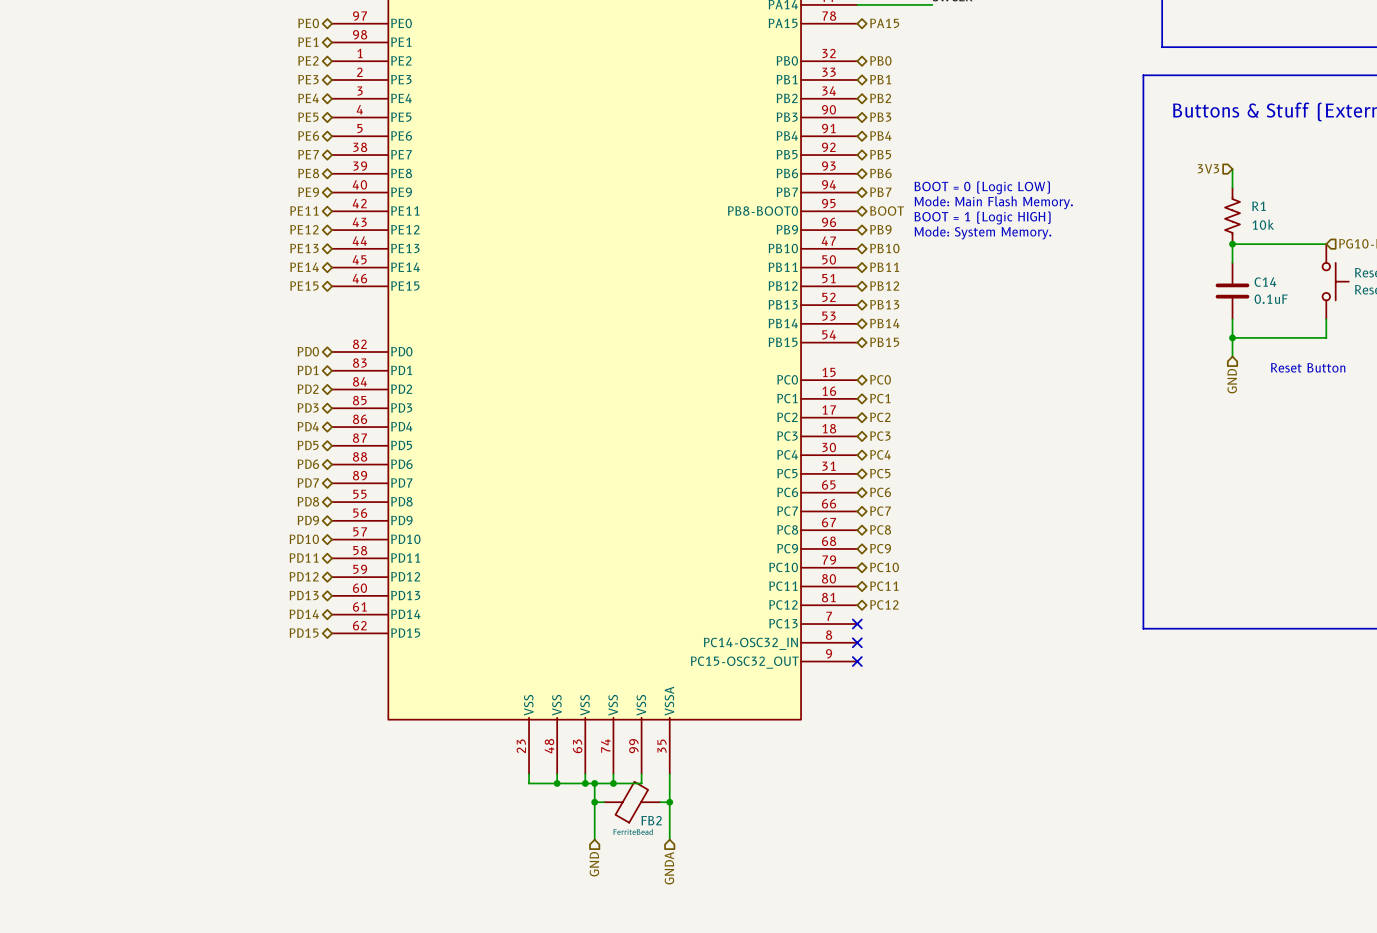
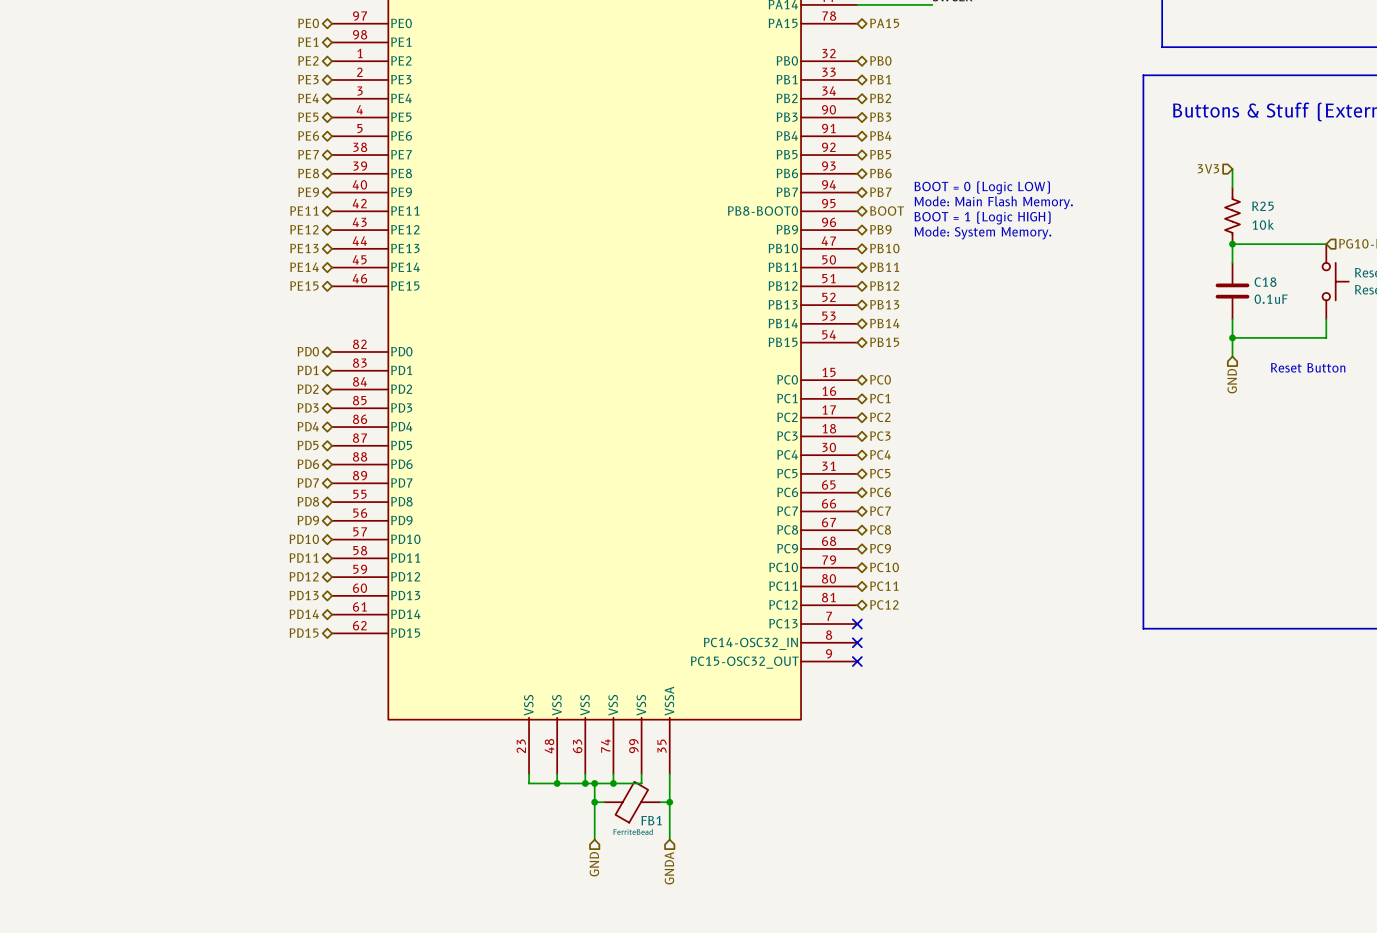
R1 name: R1 (1258, 206) -> R25 (1263, 206)
C14 name: C14 (1265, 282) -> C18 (1265, 282)
FB2 name: FB2 (651, 820) -> FB1 (651, 820)

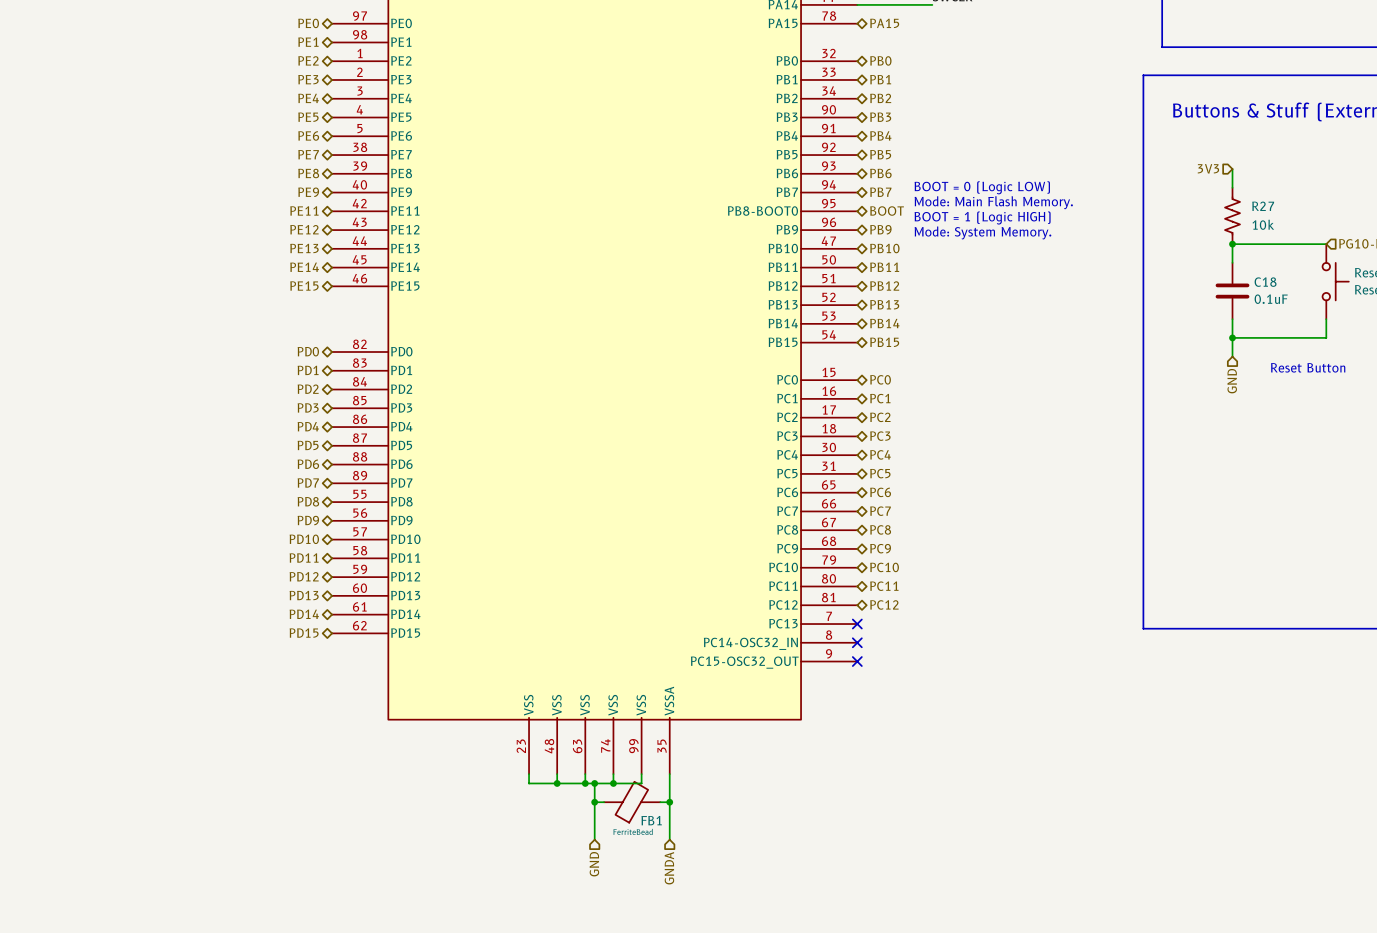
R25 name: R25 (1263, 206) -> R27 (1263, 206)

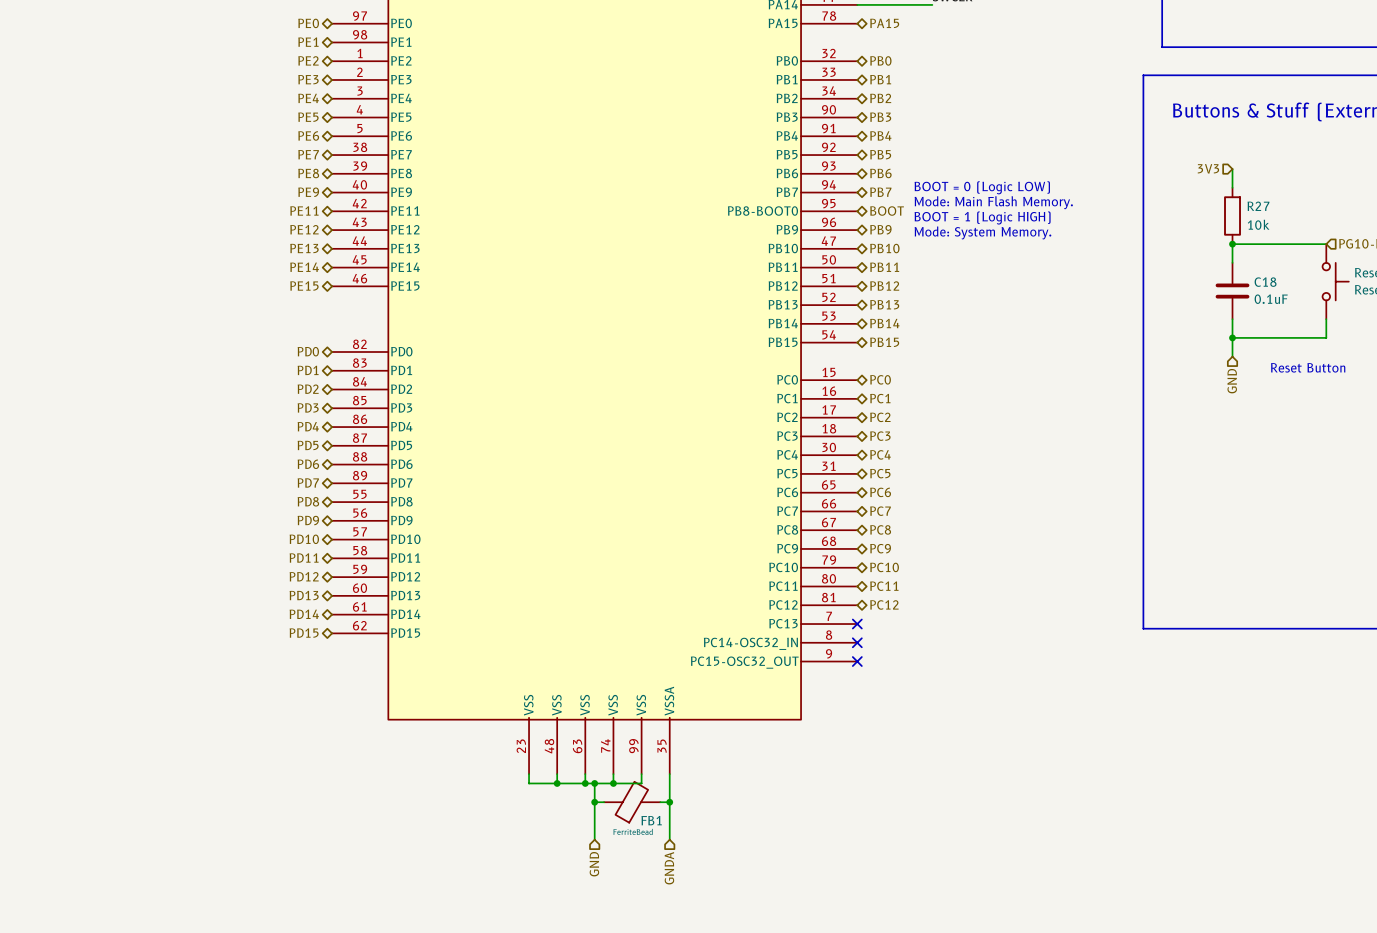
R27 symbol: [1225, 187, 1241, 245] -> [1224, 187, 1241, 245]

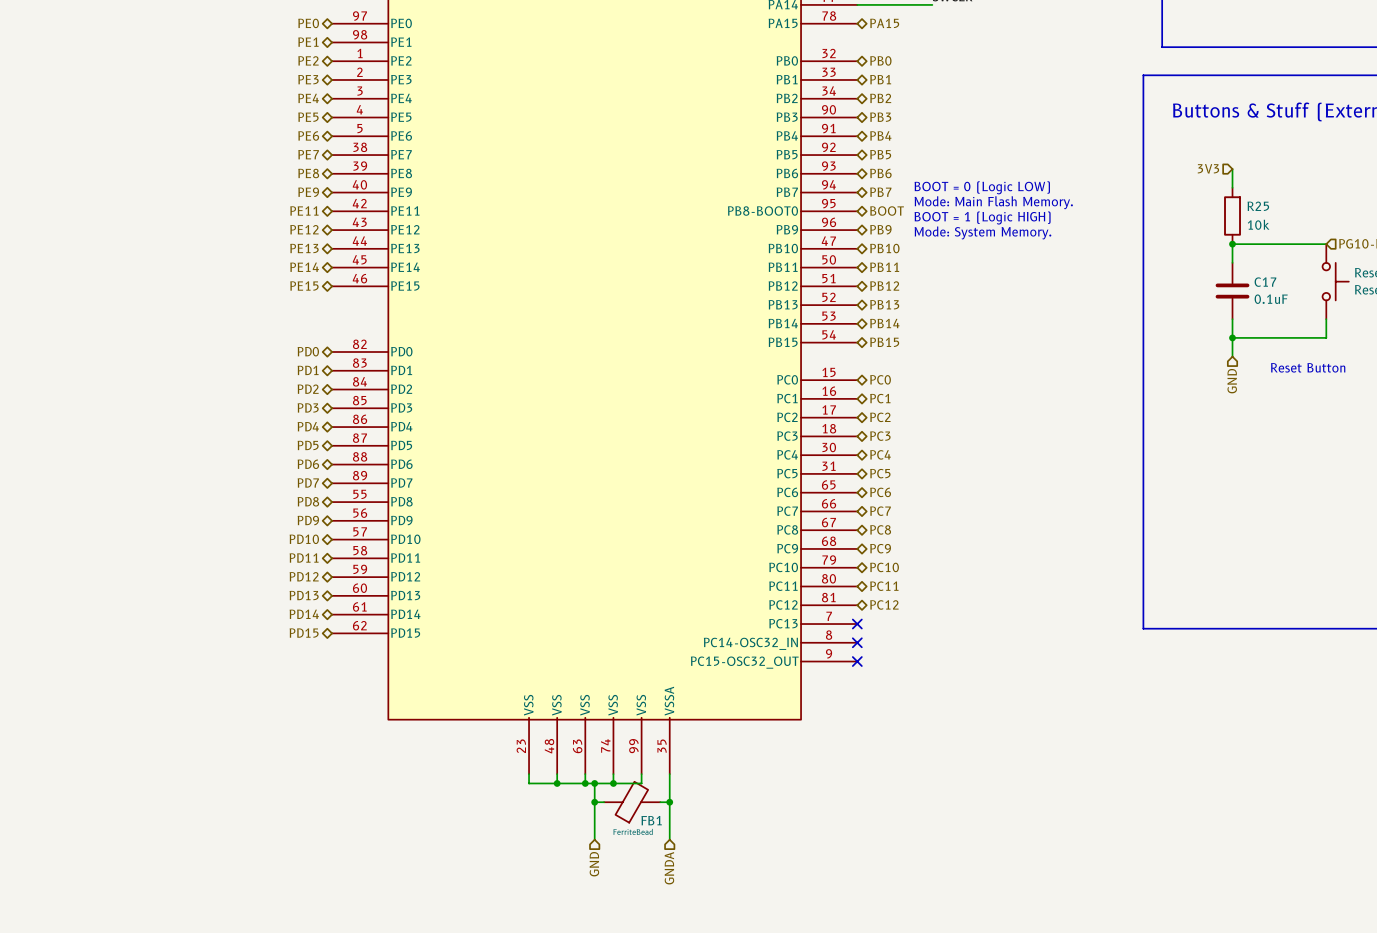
R27 name: R27 (1258, 206) -> R25 (1258, 206)
C18 name: C18 (1265, 282) -> C17 (1265, 282)

